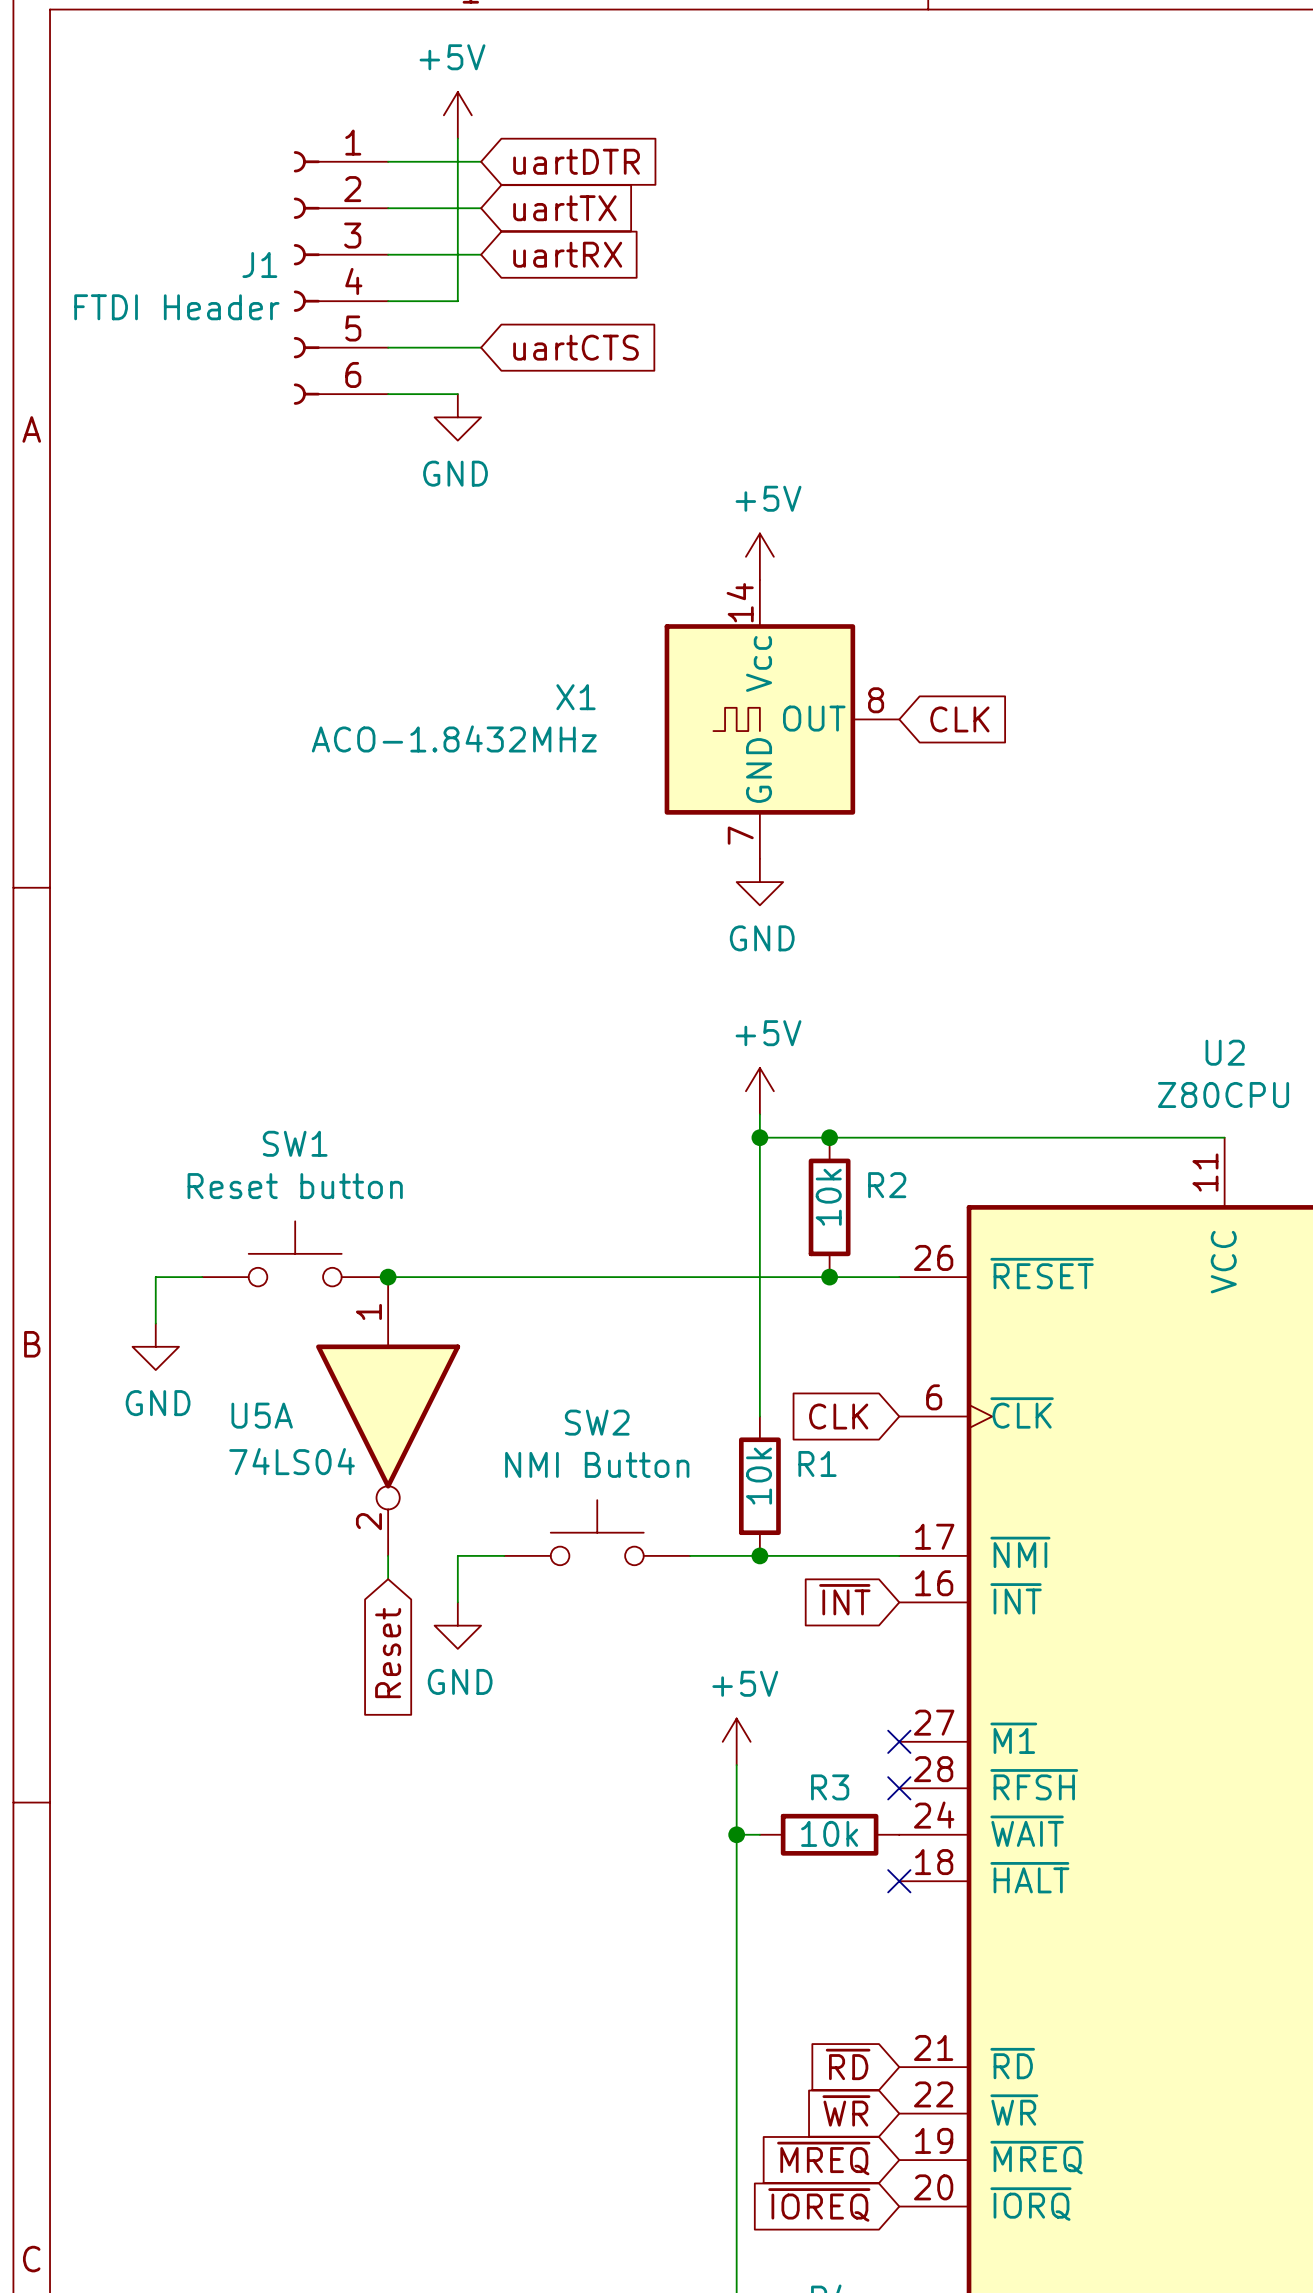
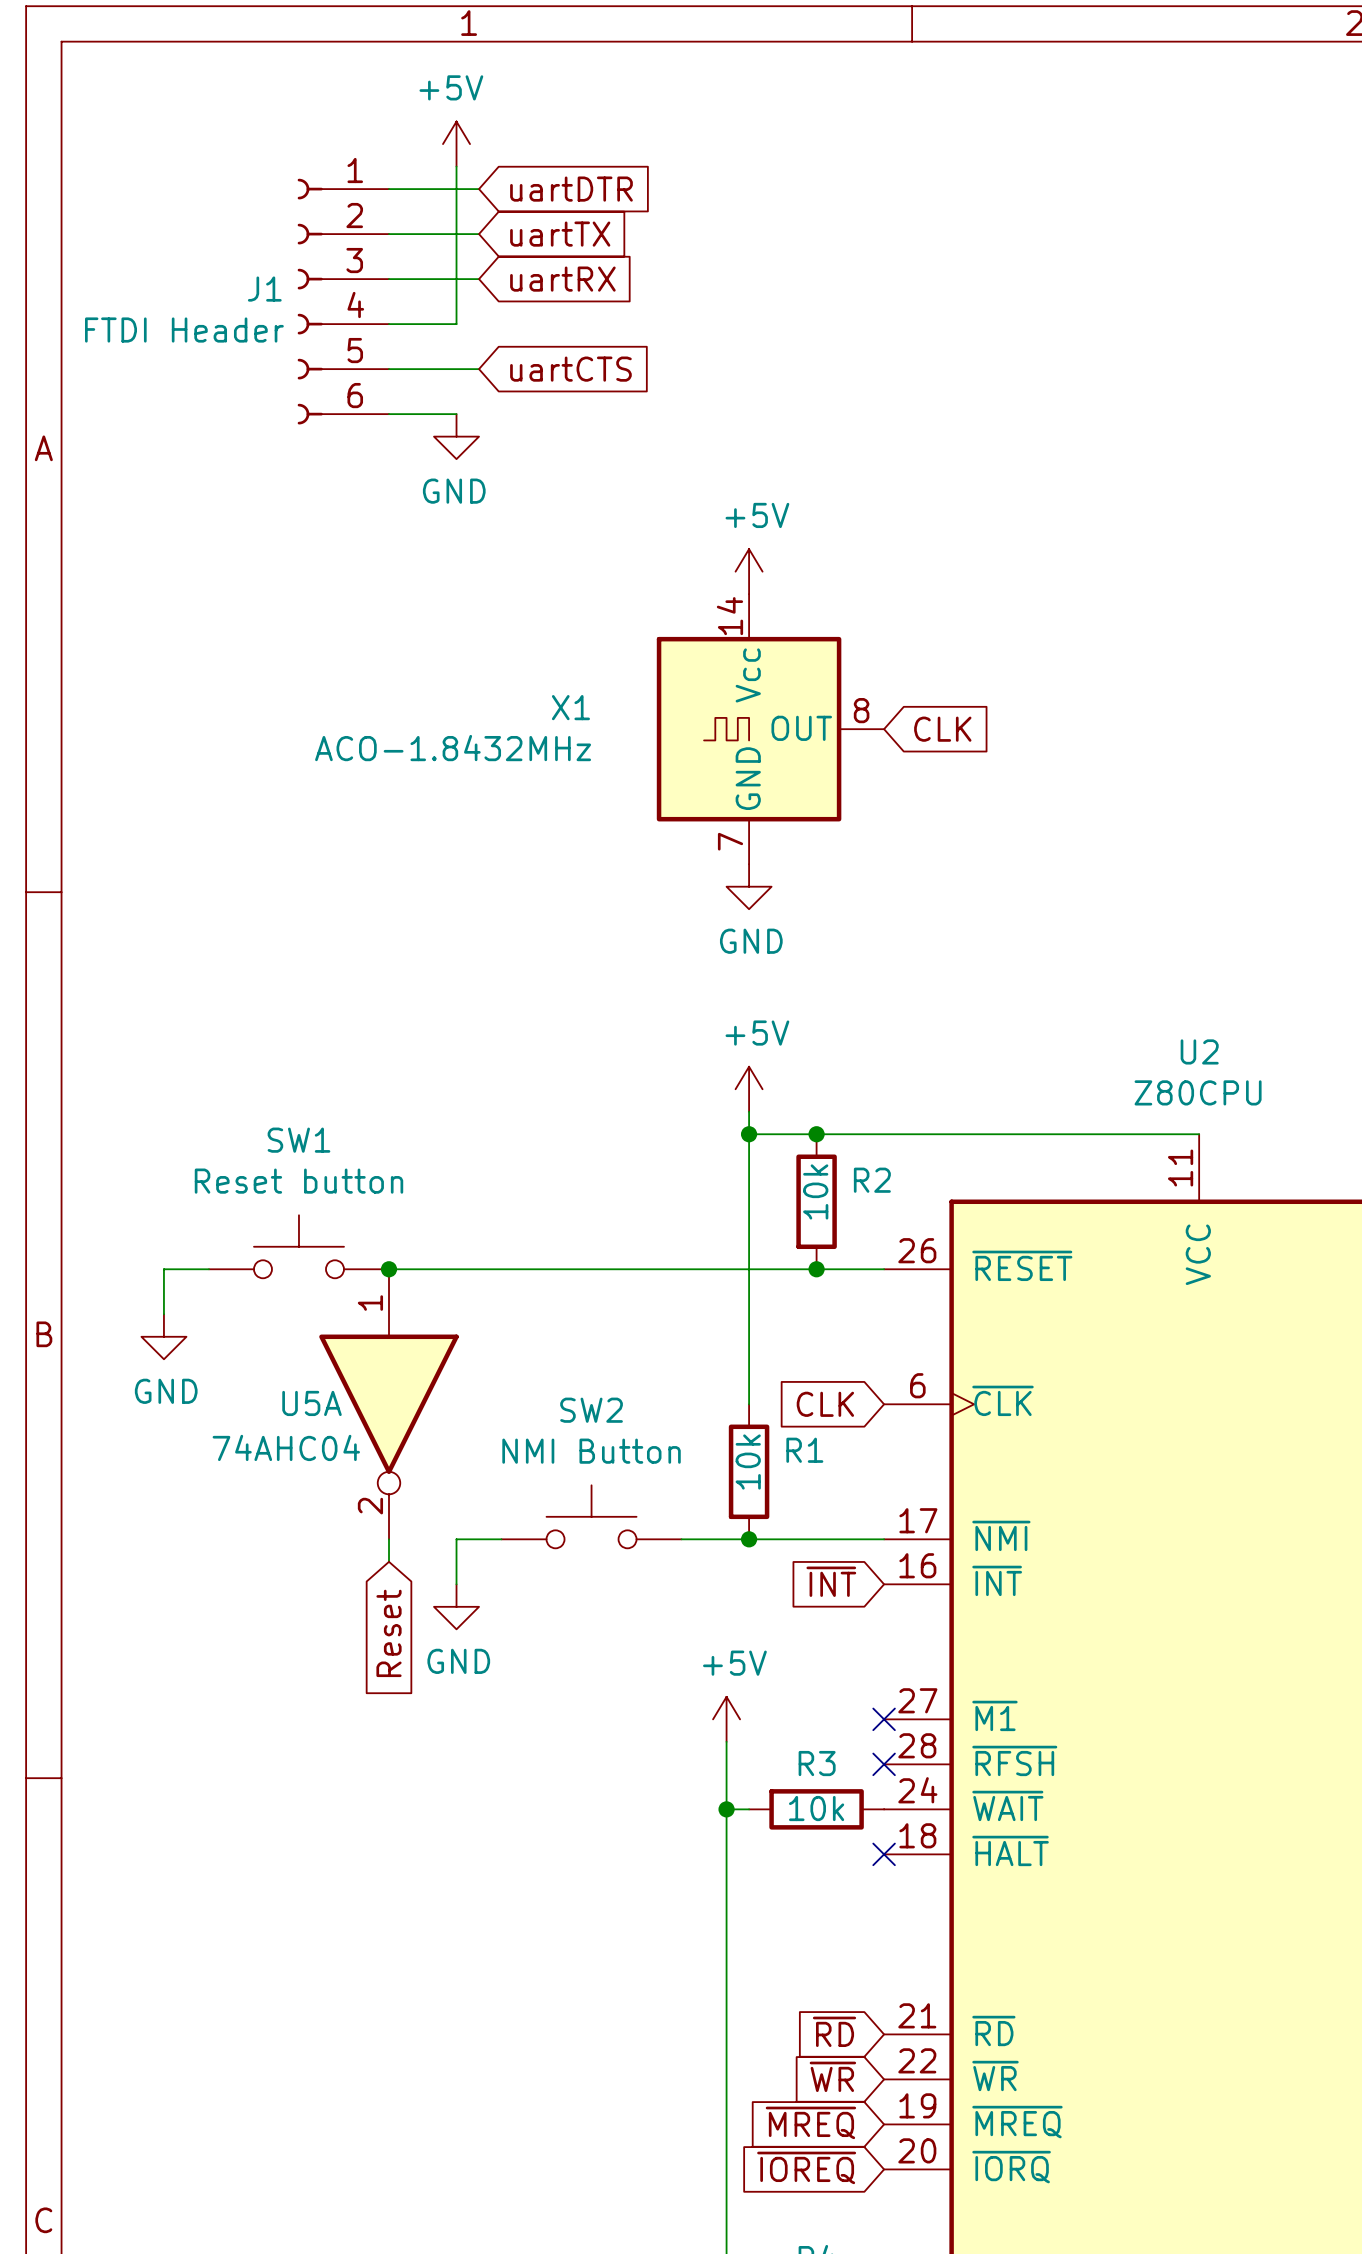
U5A name position: U5A (262, 1415) -> U5A (312, 1403)
U5A value: 74LS04 (292, 1461) -> 74AHC04 (286, 1447)

